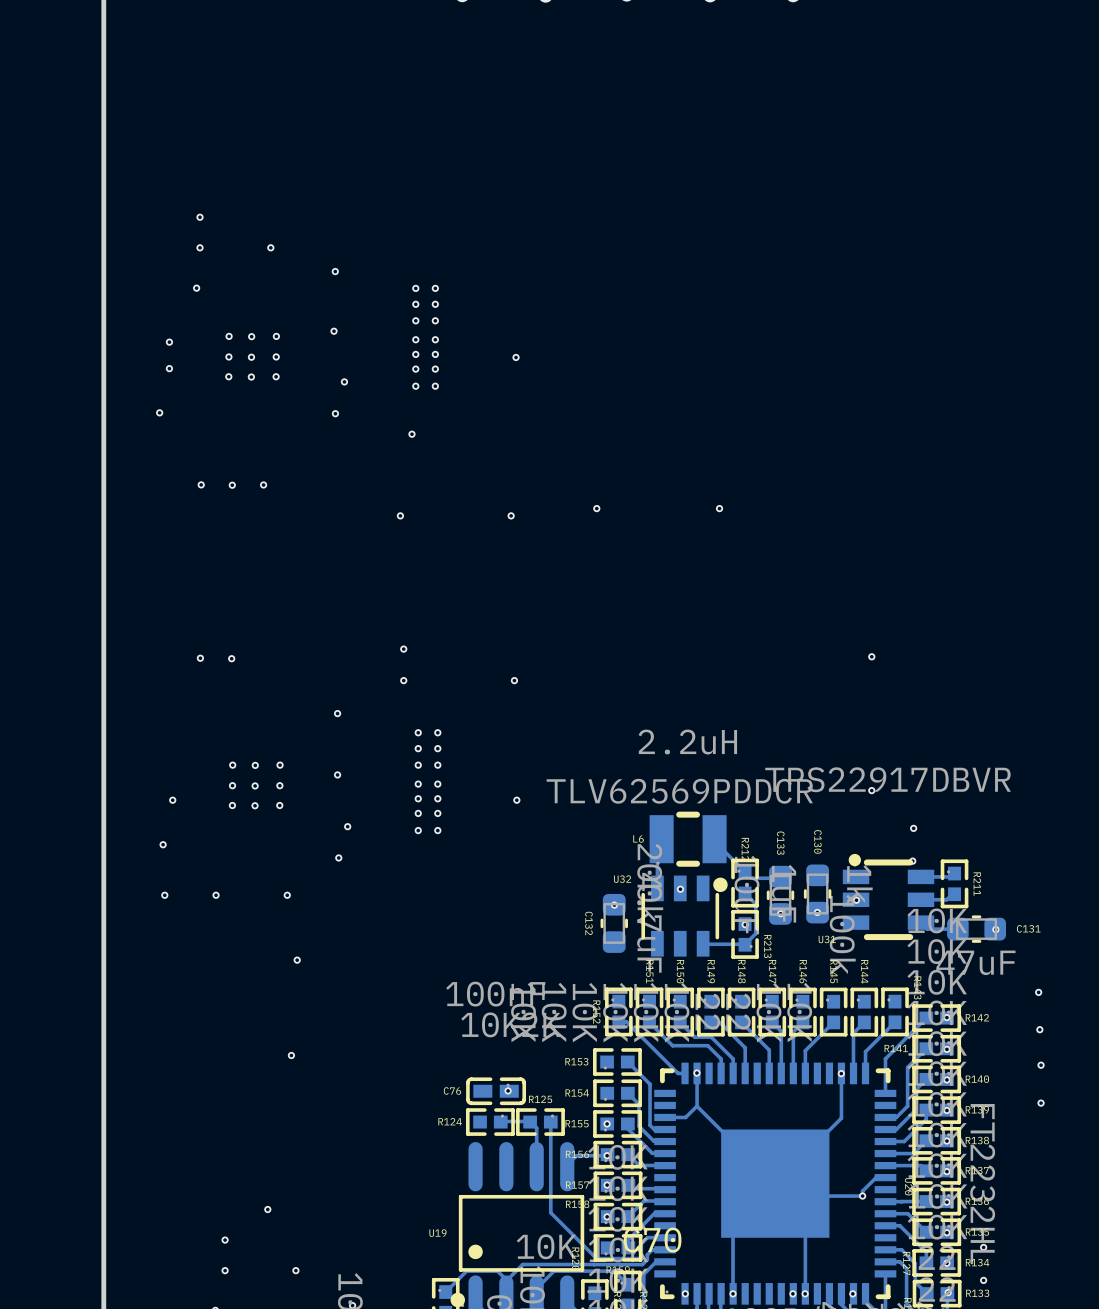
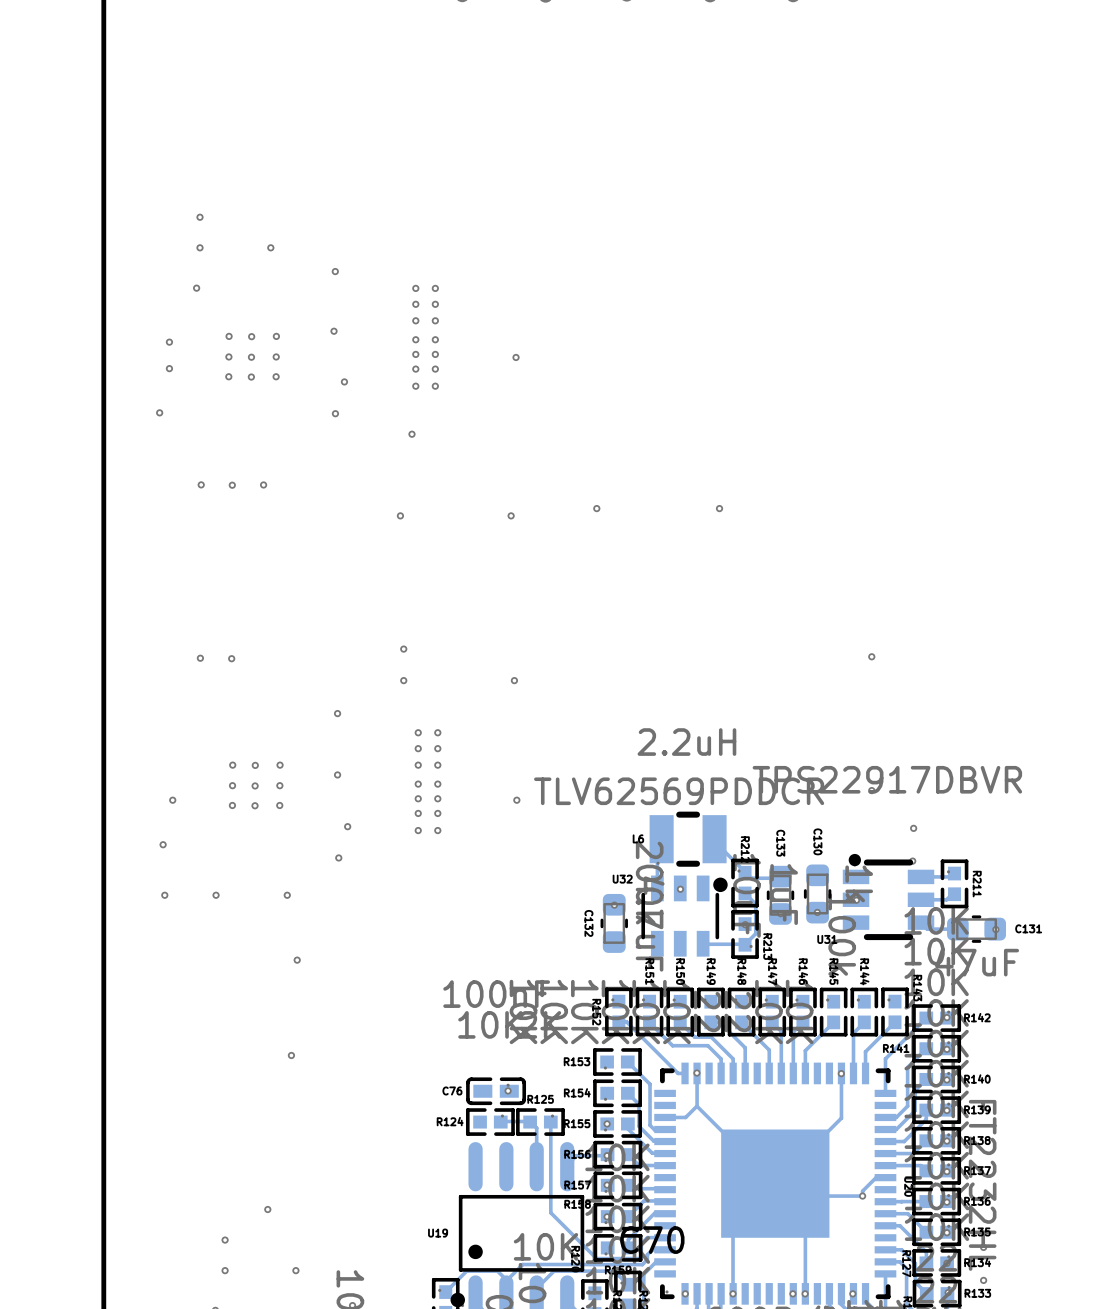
via: (1038, 992) -> none
via: (1039, 1029) -> none
via: (1041, 1065) -> none
via: (1041, 1103) -> none

